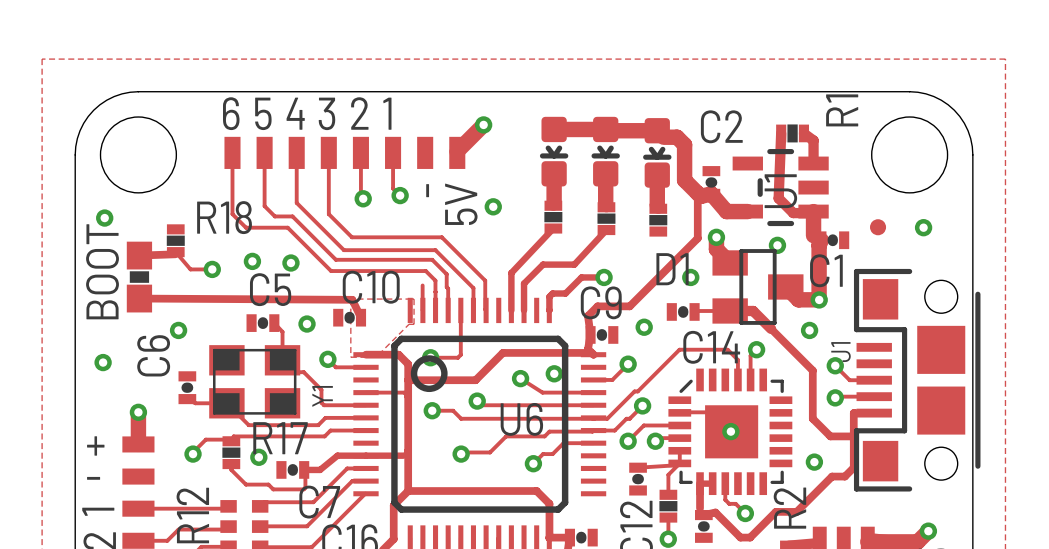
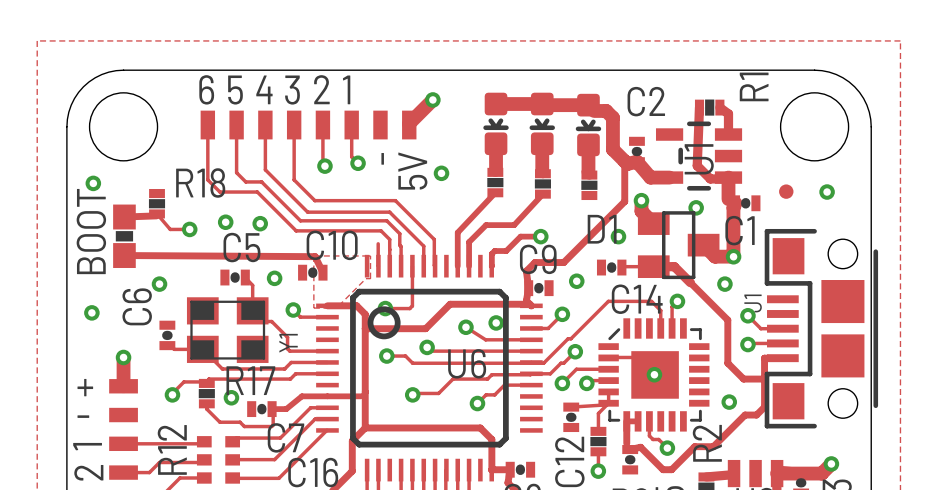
track: (366, 392) (404, 392) (408, 396) -> none

